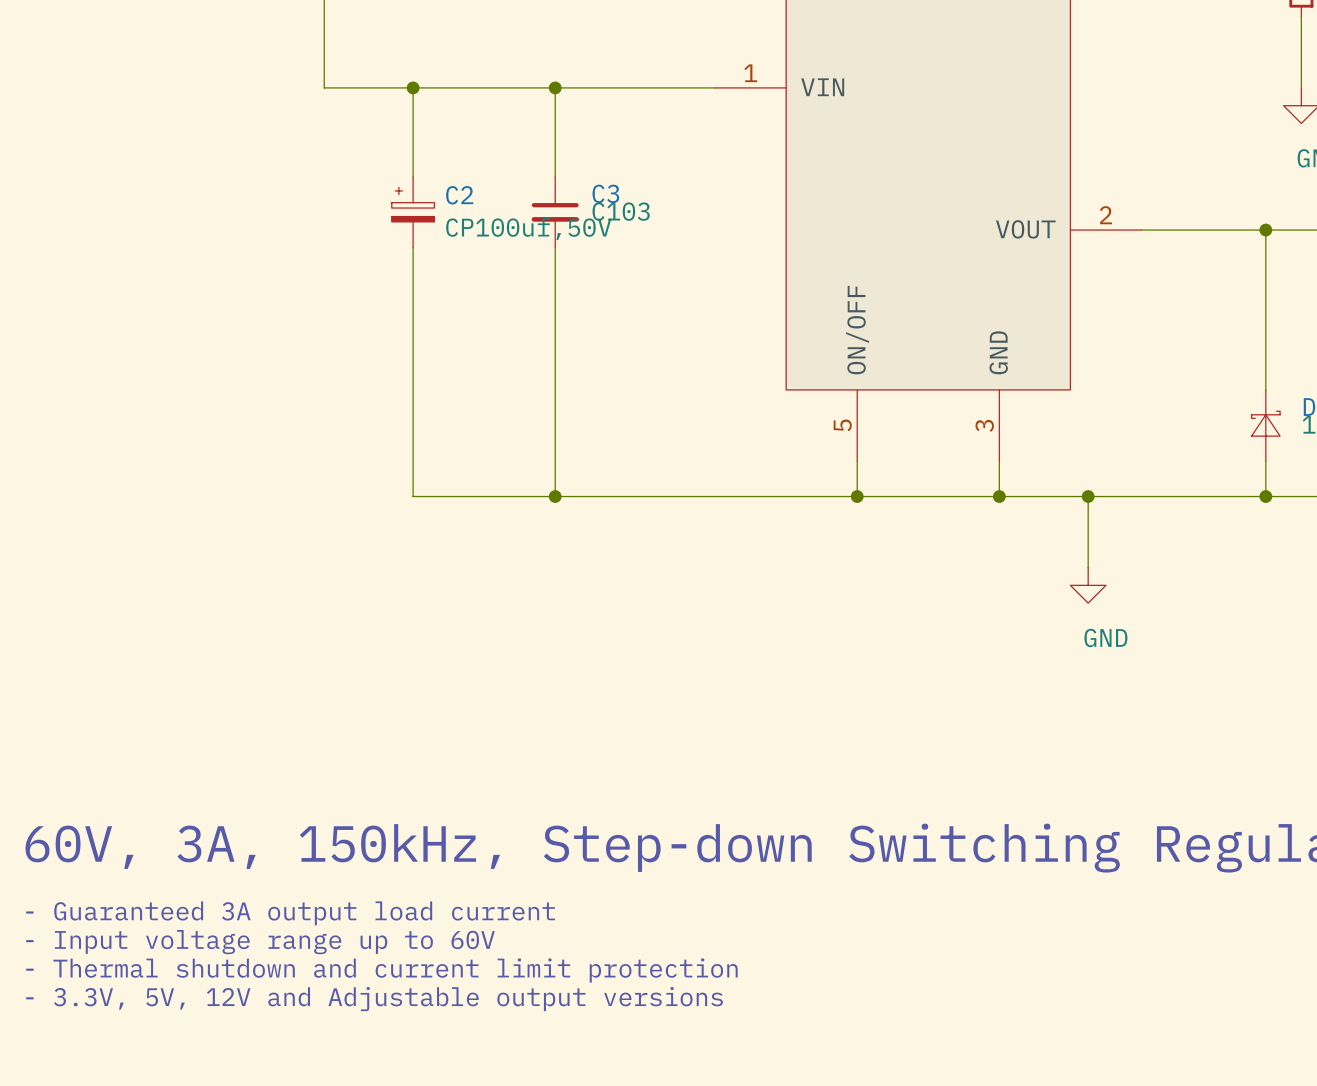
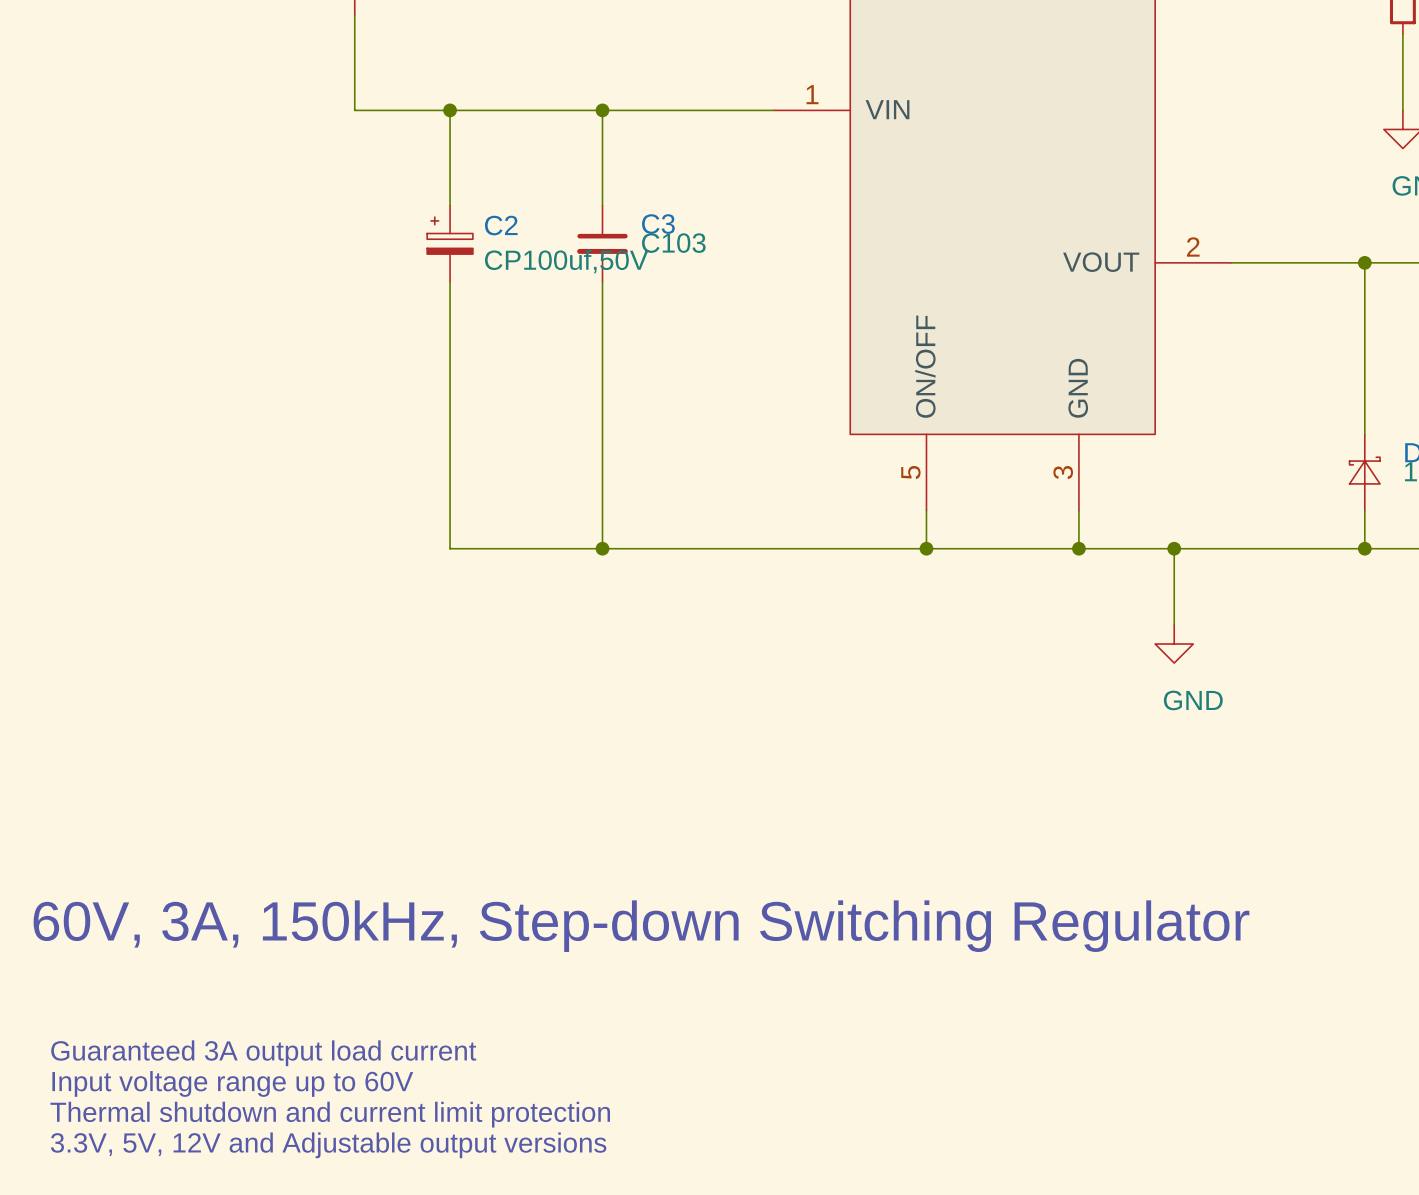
text: - Guaranteed 3A output load current (290, 913) -> none
text: - Input voltage range up to 60V (260, 942) -> none
text: none -> Guaranteed 3A output load current (263, 1053)
text: - Thermal shutdown and current limit protection (381, 970) -> none
text: none -> Input voltage range up to 60V (232, 1083)
text: - 3.3V, 5V, 12V and Adjustable output versions (374, 999) -> none
text: none -> Thermal shutdown and current limit protection (330, 1114)
text: none -> 3.3V, 5V, 12V and Adjustable output versions (328, 1145)

